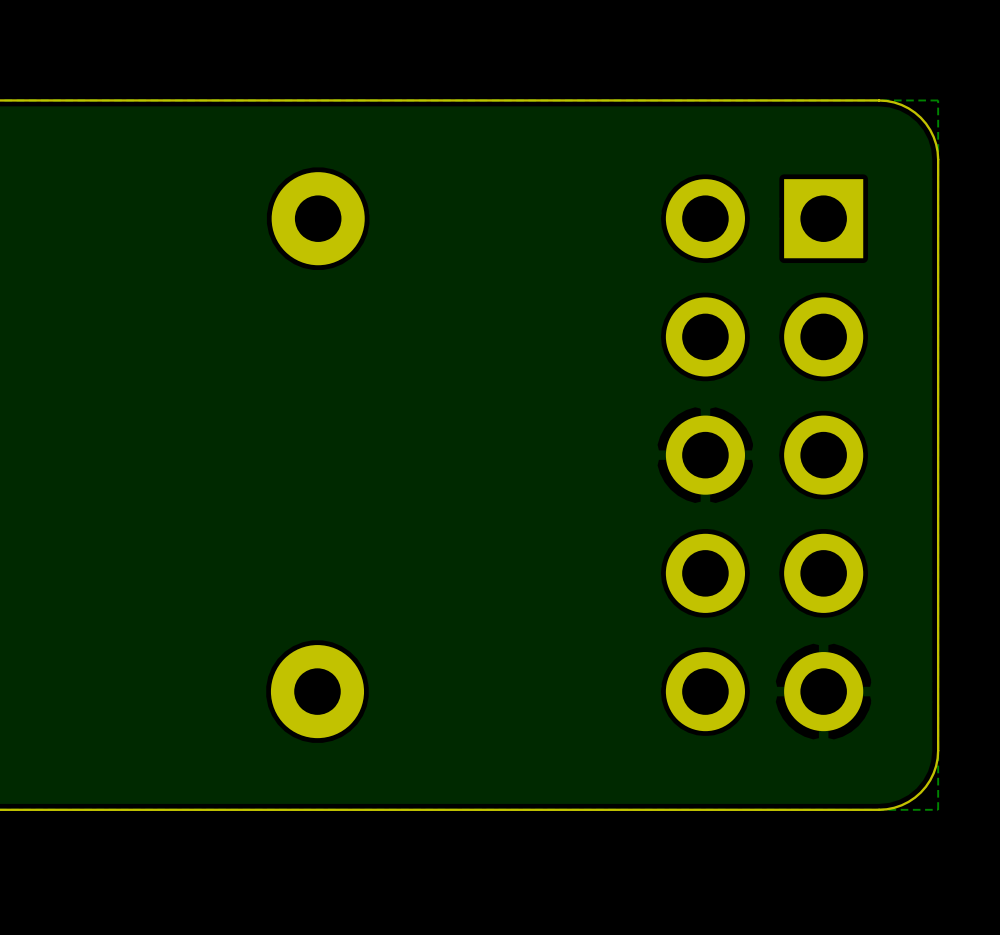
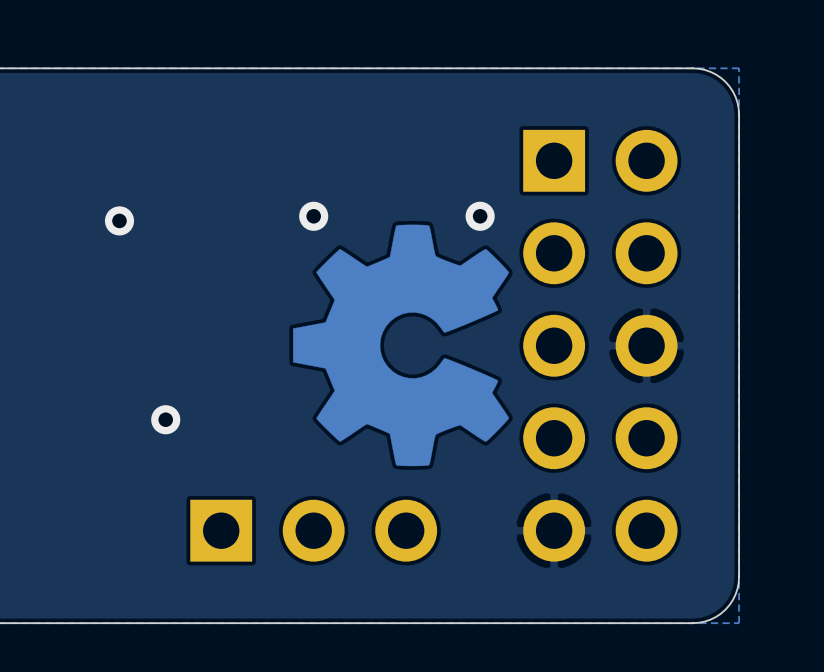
part footprint: [665, 179, 864, 732] -> [523, 129, 678, 562]
part: (318, 218) -> none
via: none -> (313, 216)
via: none -> (480, 216)
via: none -> (119, 220)
drawing: none -> [293, 224, 510, 467]
via: none -> (165, 419)
part: (317, 691) -> none
part: none -> (313, 530)

